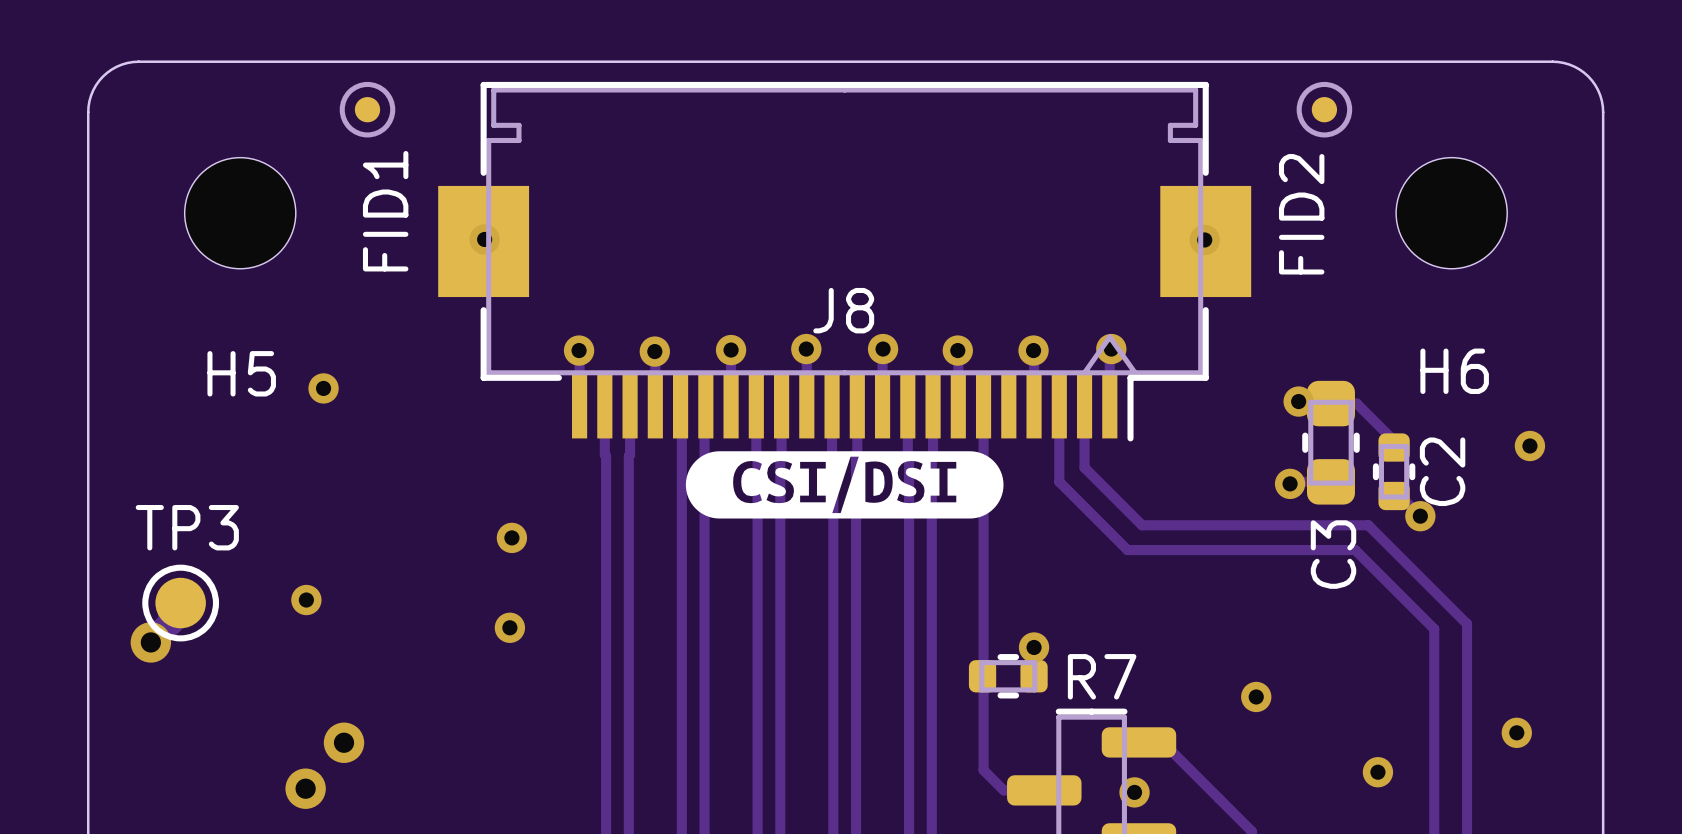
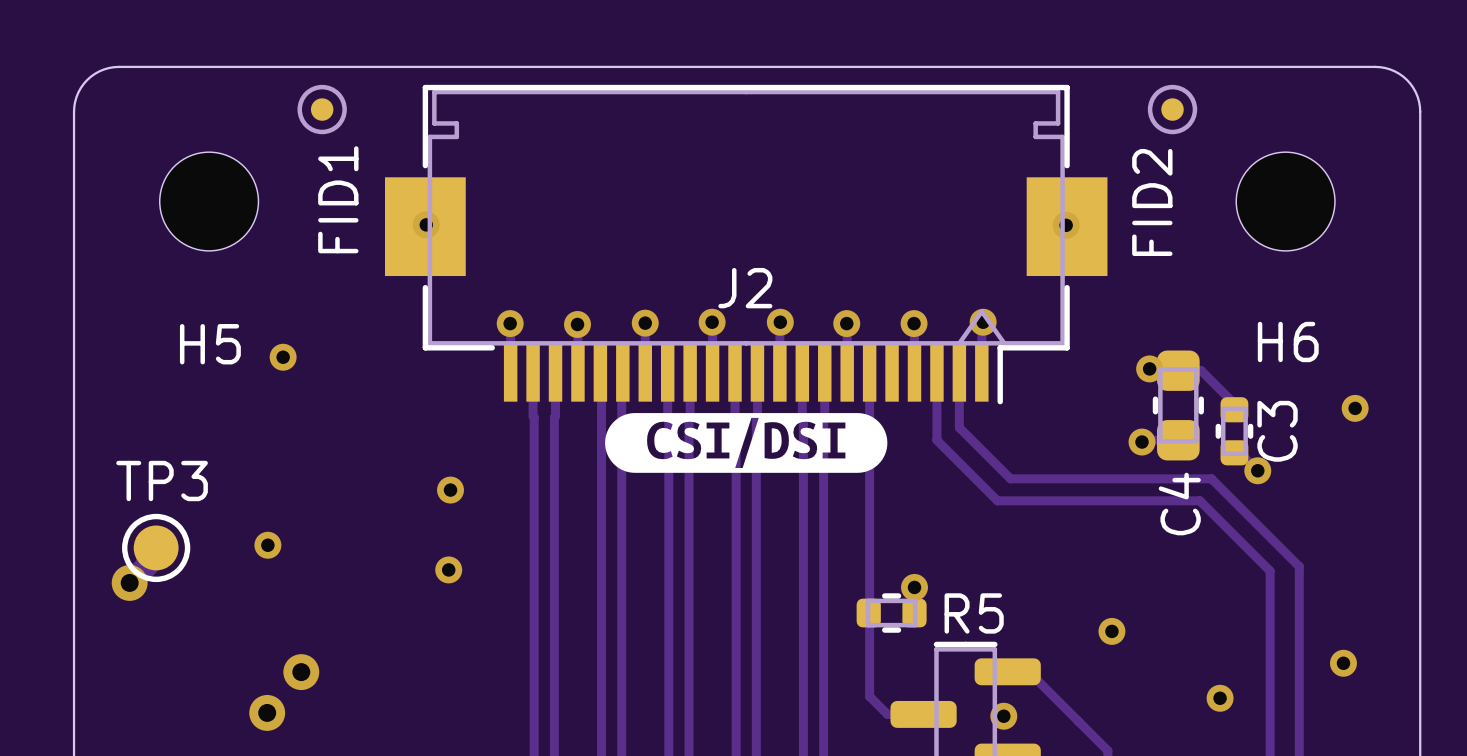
J8 name: J8 (843, 310) -> J2 (745, 288)
C2 name: C2 (1442, 471) -> C3 (1277, 431)
C3 name: C3 (1333, 554) -> C4 (1179, 504)
R7 name: R7 (1102, 676) -> R5 (974, 613)

